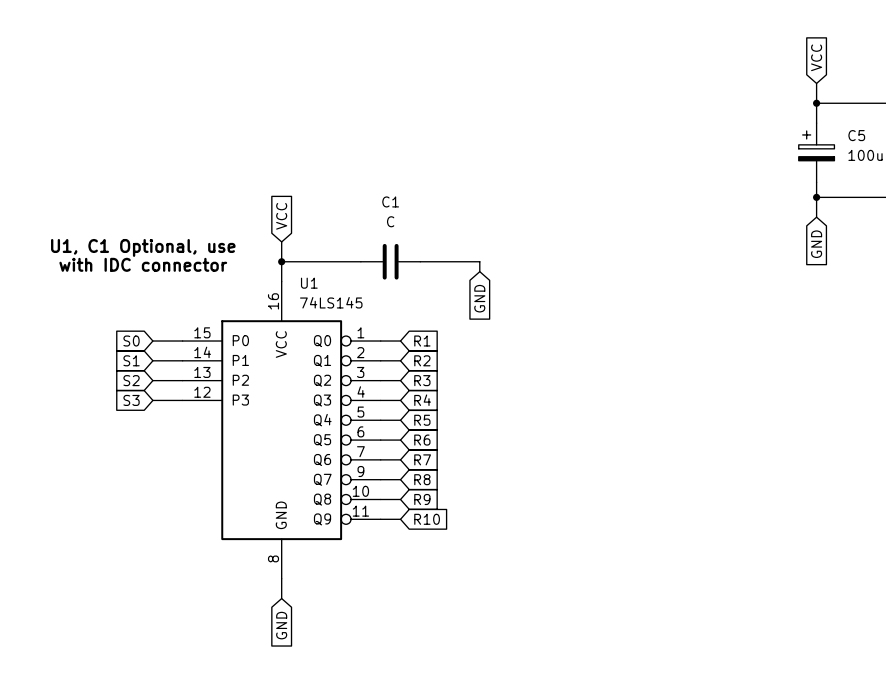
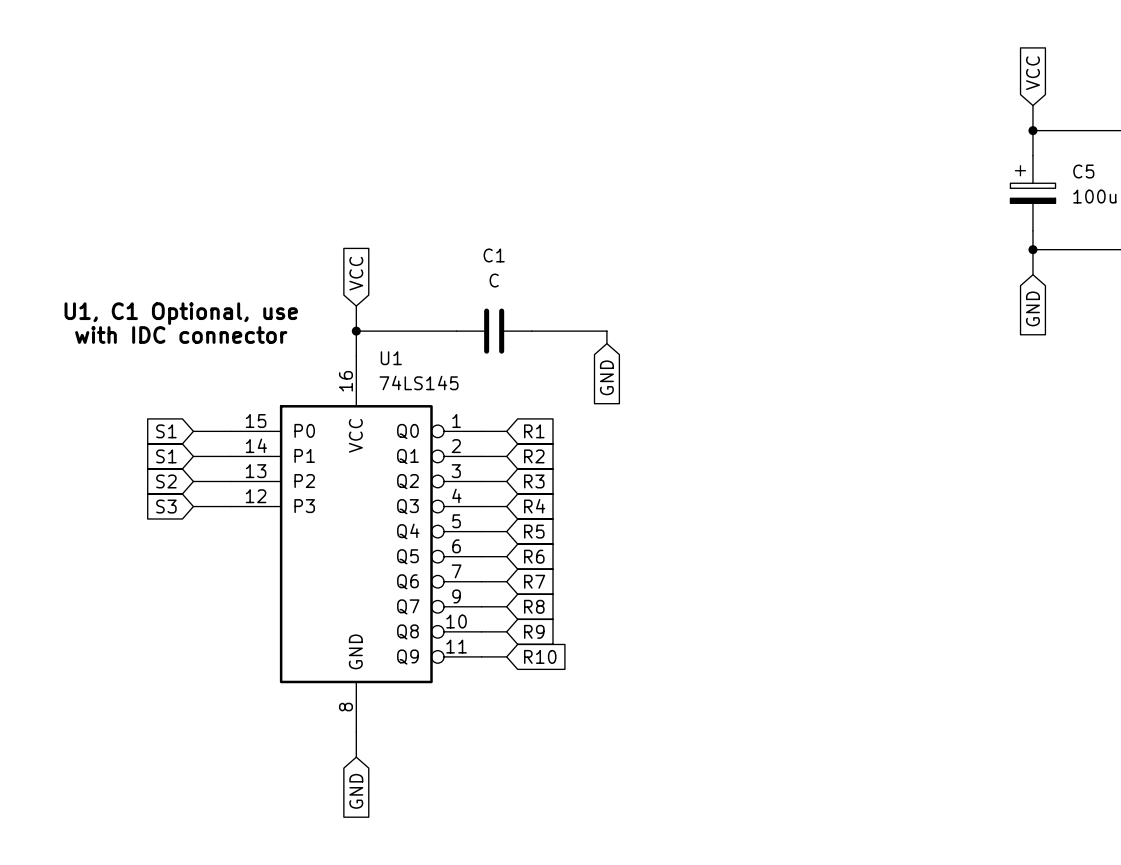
global label: S0 (131, 341) -> S1 (166, 431)

